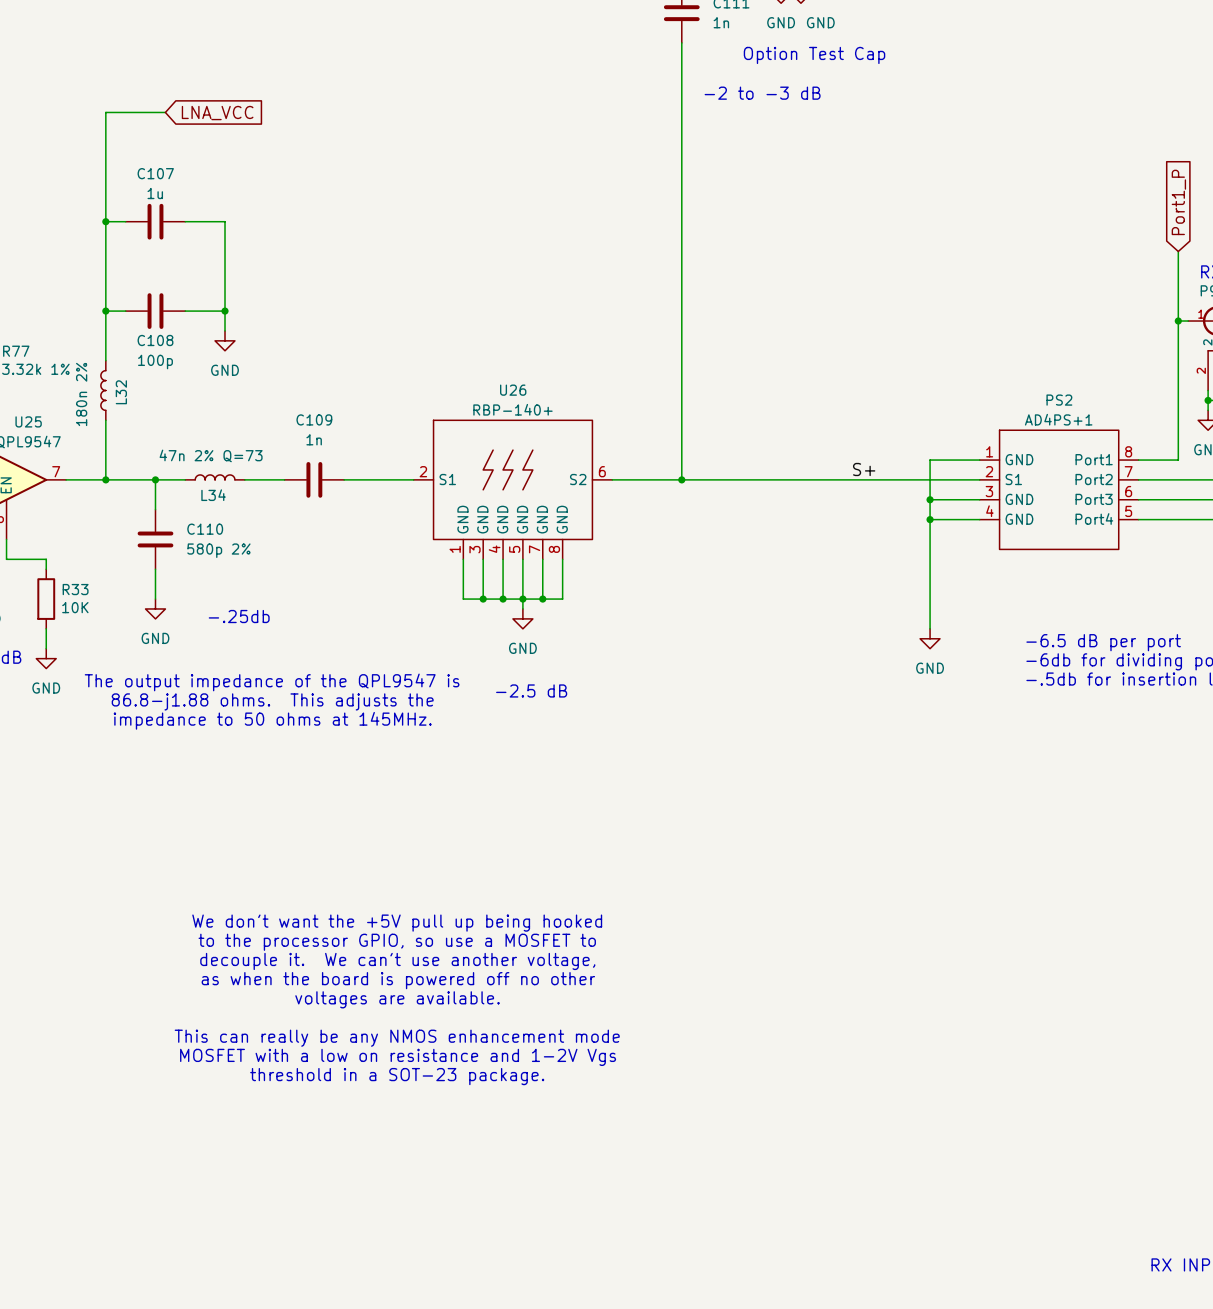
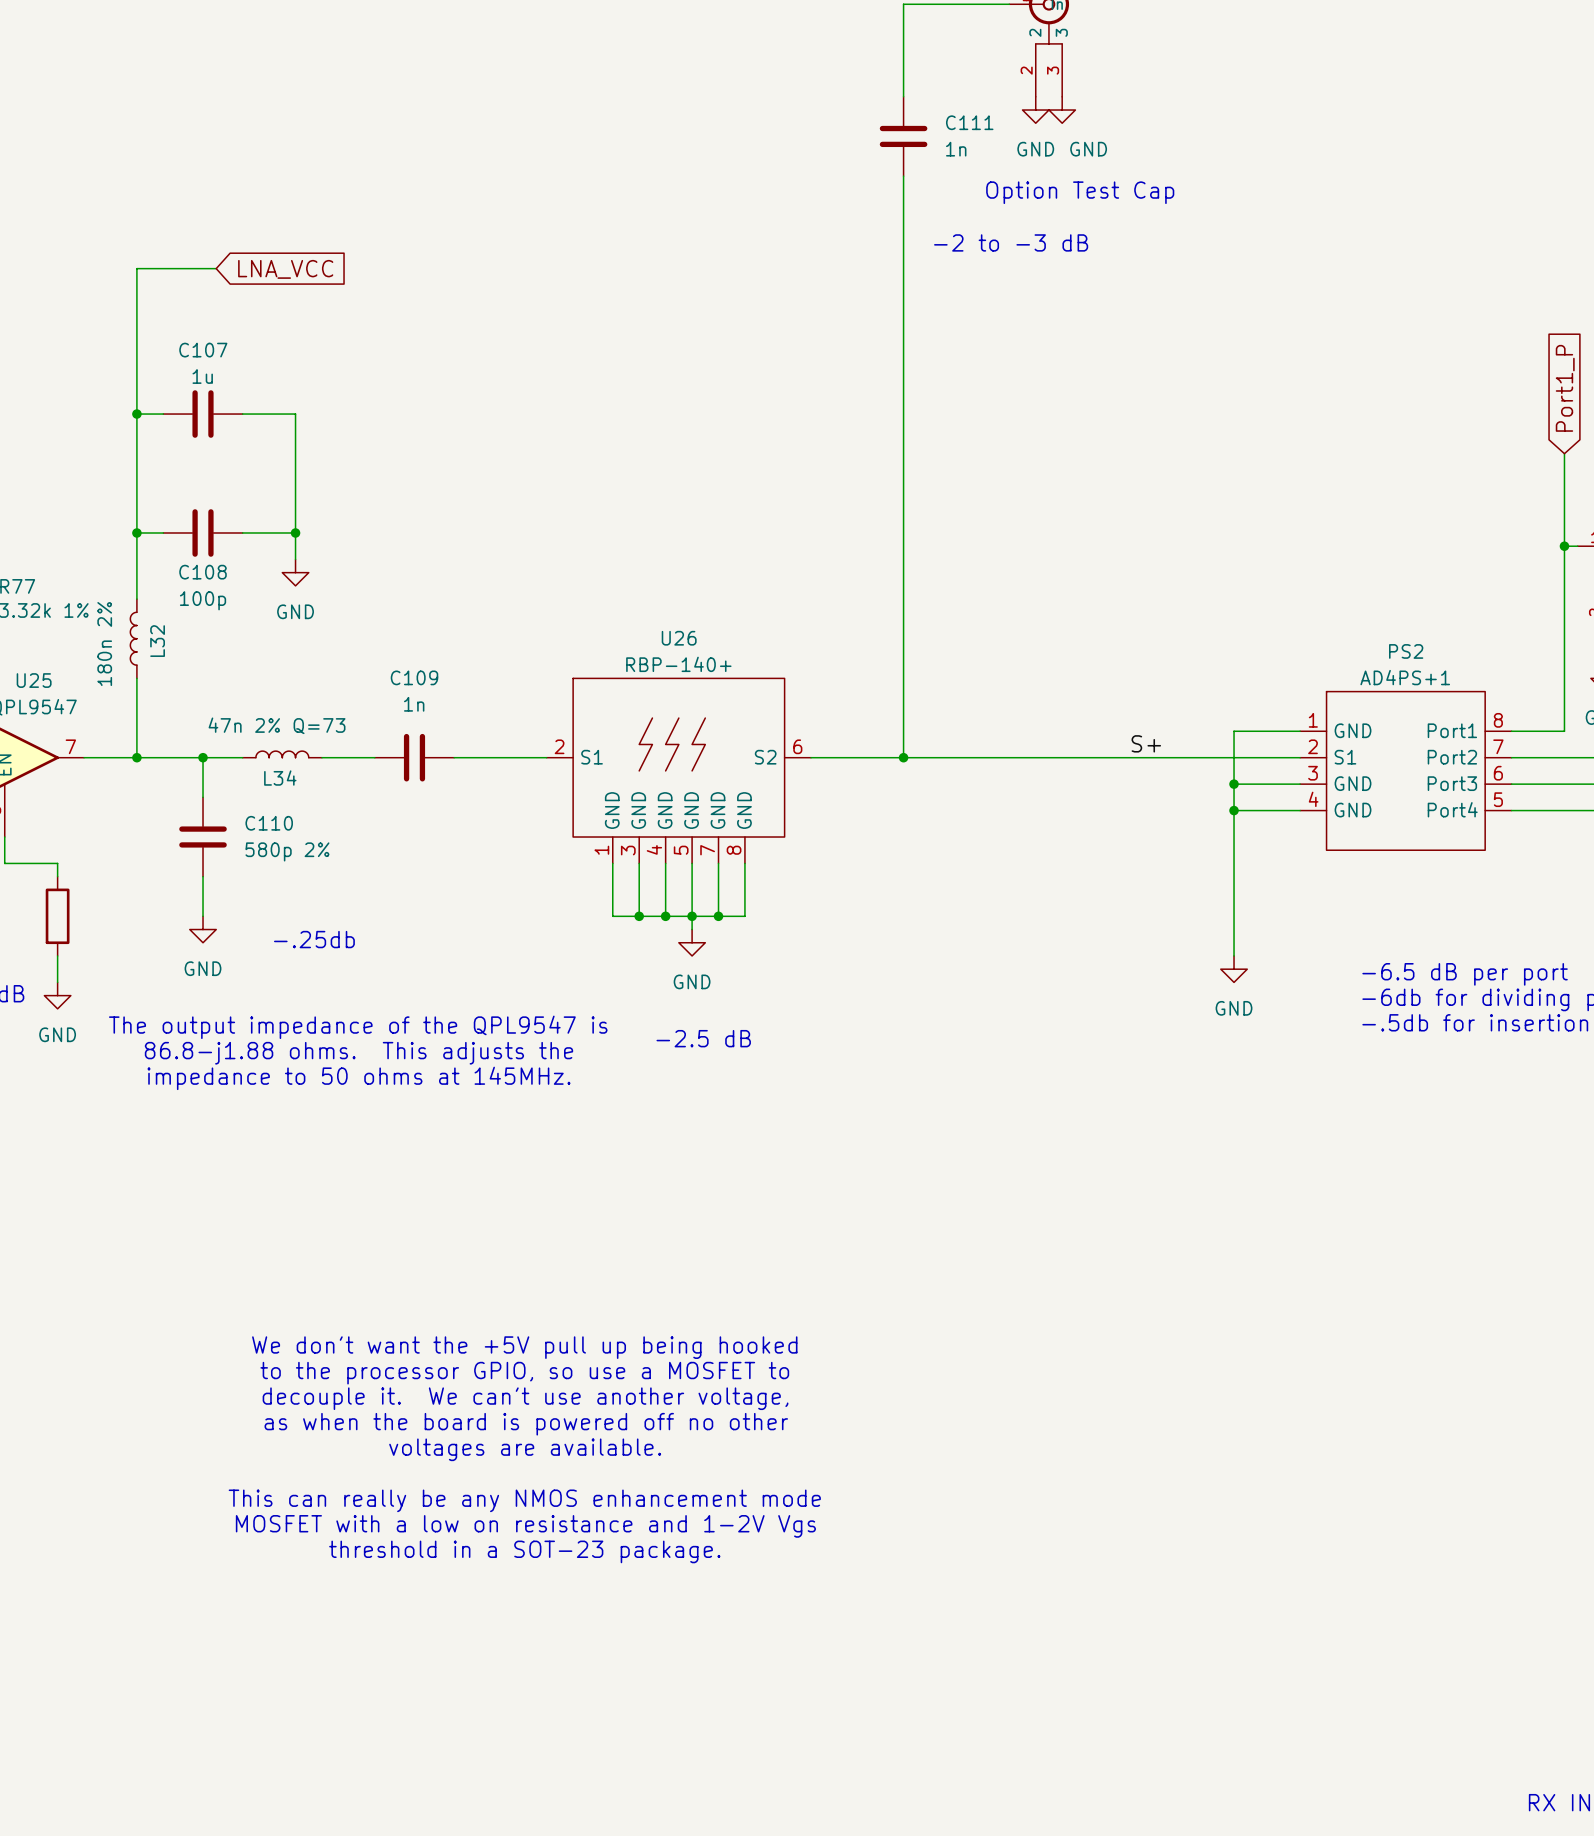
R33 name: R33 (75, 589) -> none
R33 value: 10K (75, 607) -> none

